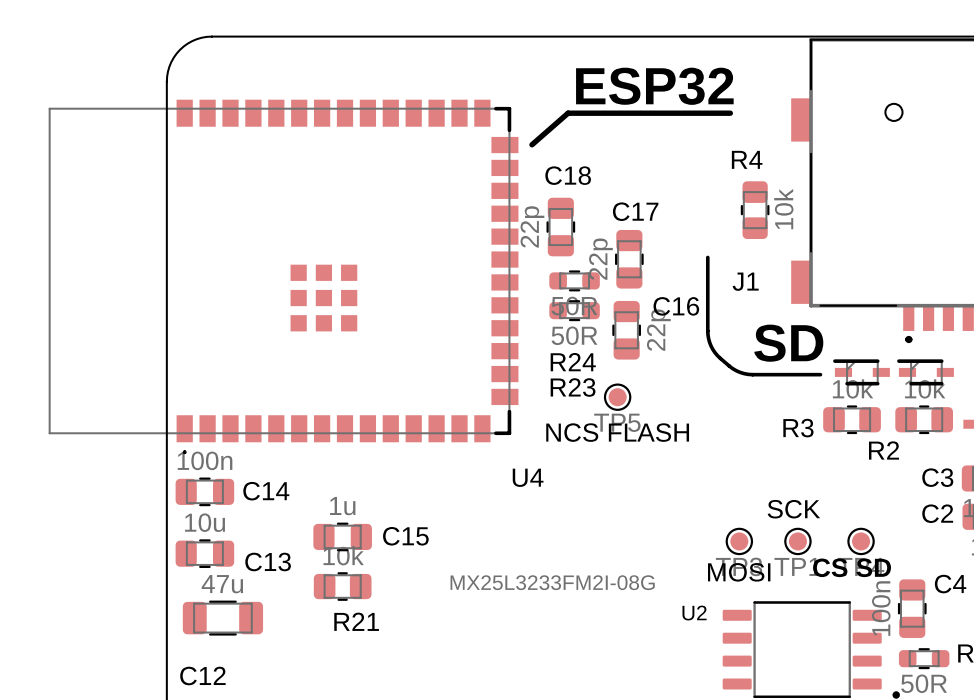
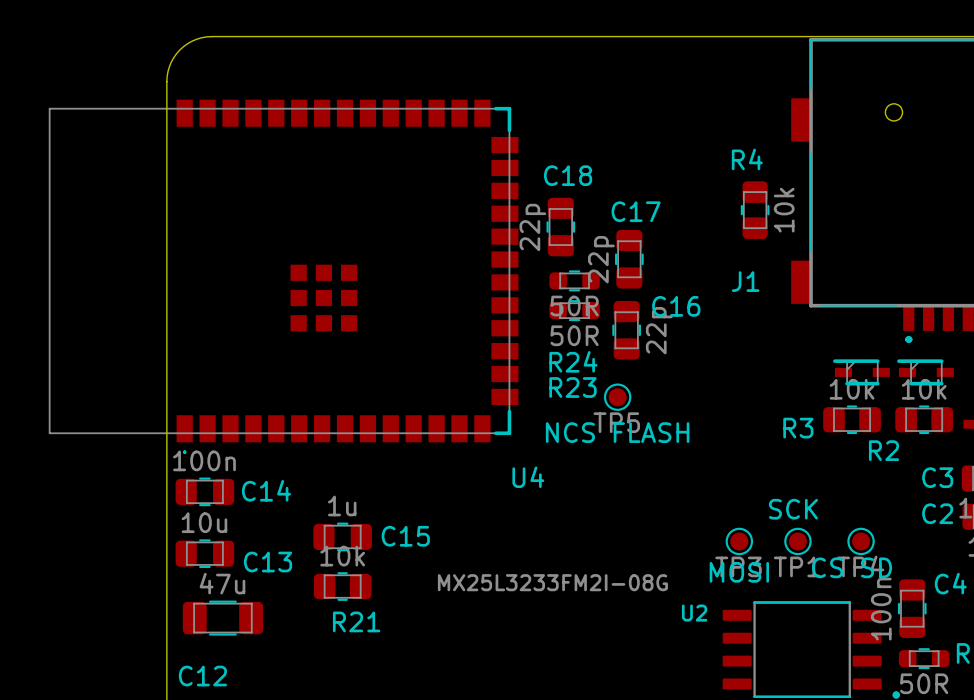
text: ESP32 (654, 86) -> none
line: (730, 113) (568, 113) (531, 144) -> none
line: (707, 257) (708, 334) (711, 346) (717, 355) (732, 368) (744, 373) (820, 374) -> none
text: SD (788, 343) -> none

